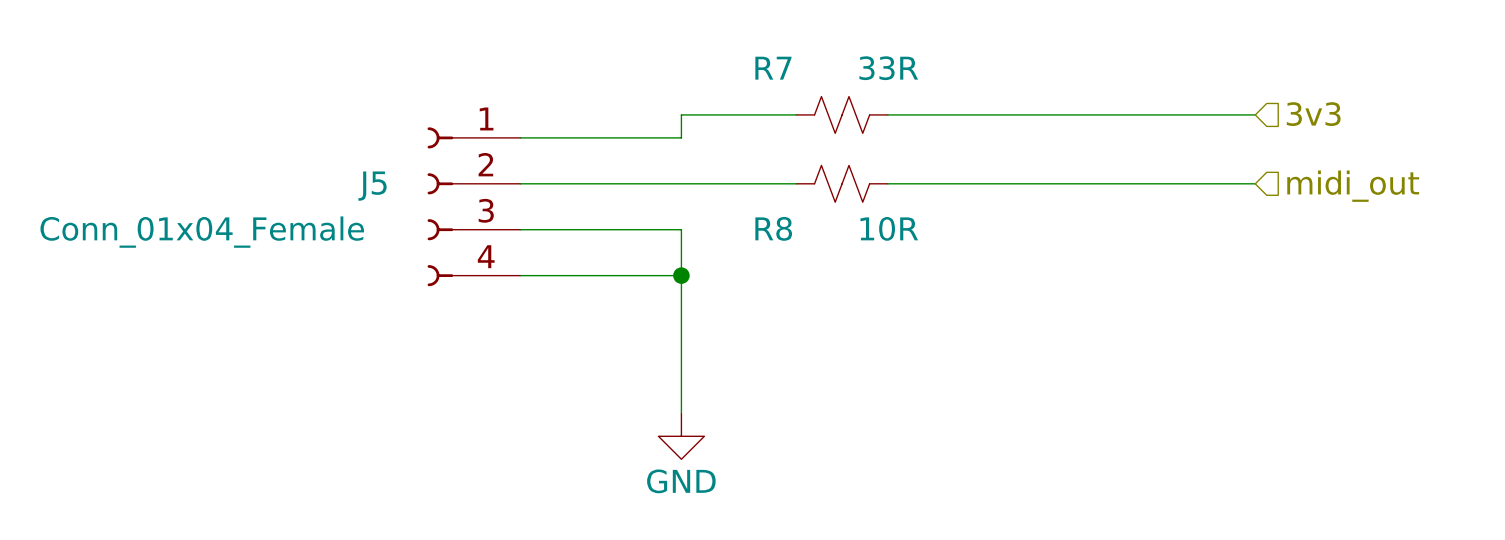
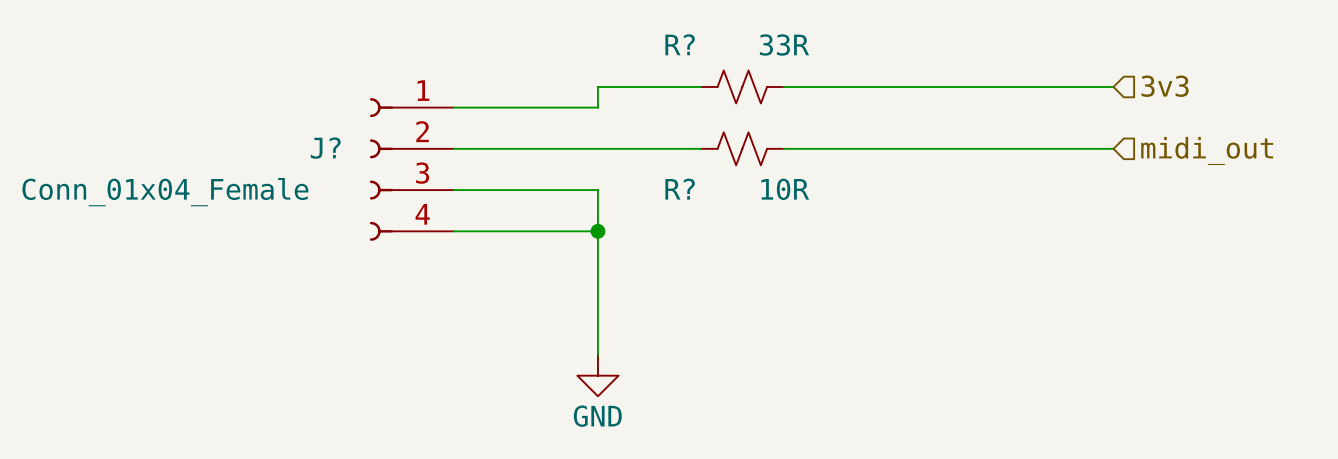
R7 name: R7 (773, 68) -> R? (680, 44)
J5 name: J5 (372, 186) -> J? (325, 148)
R8 name: R8 (773, 228) -> R? (680, 189)

